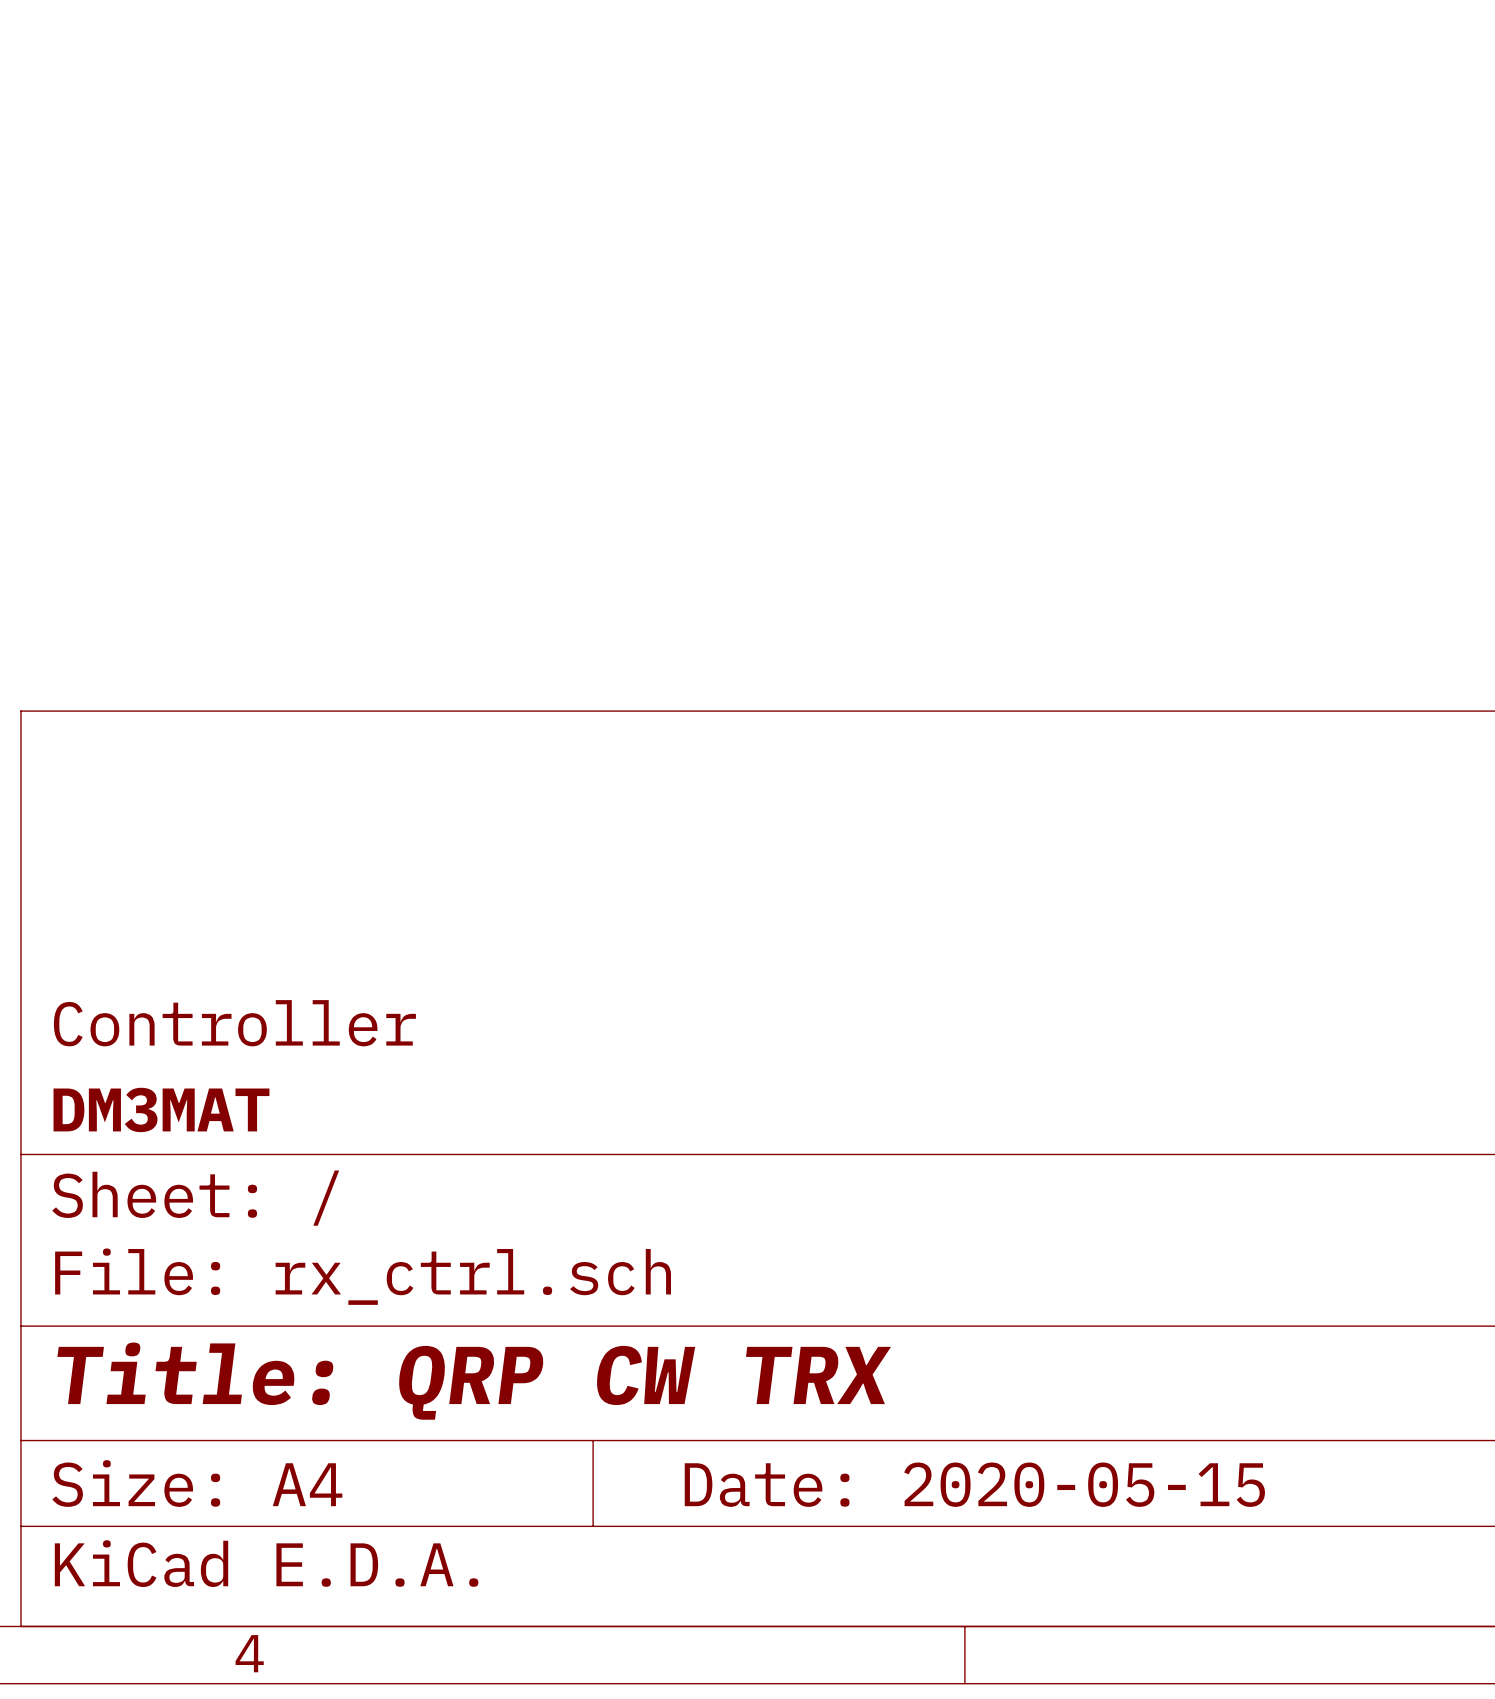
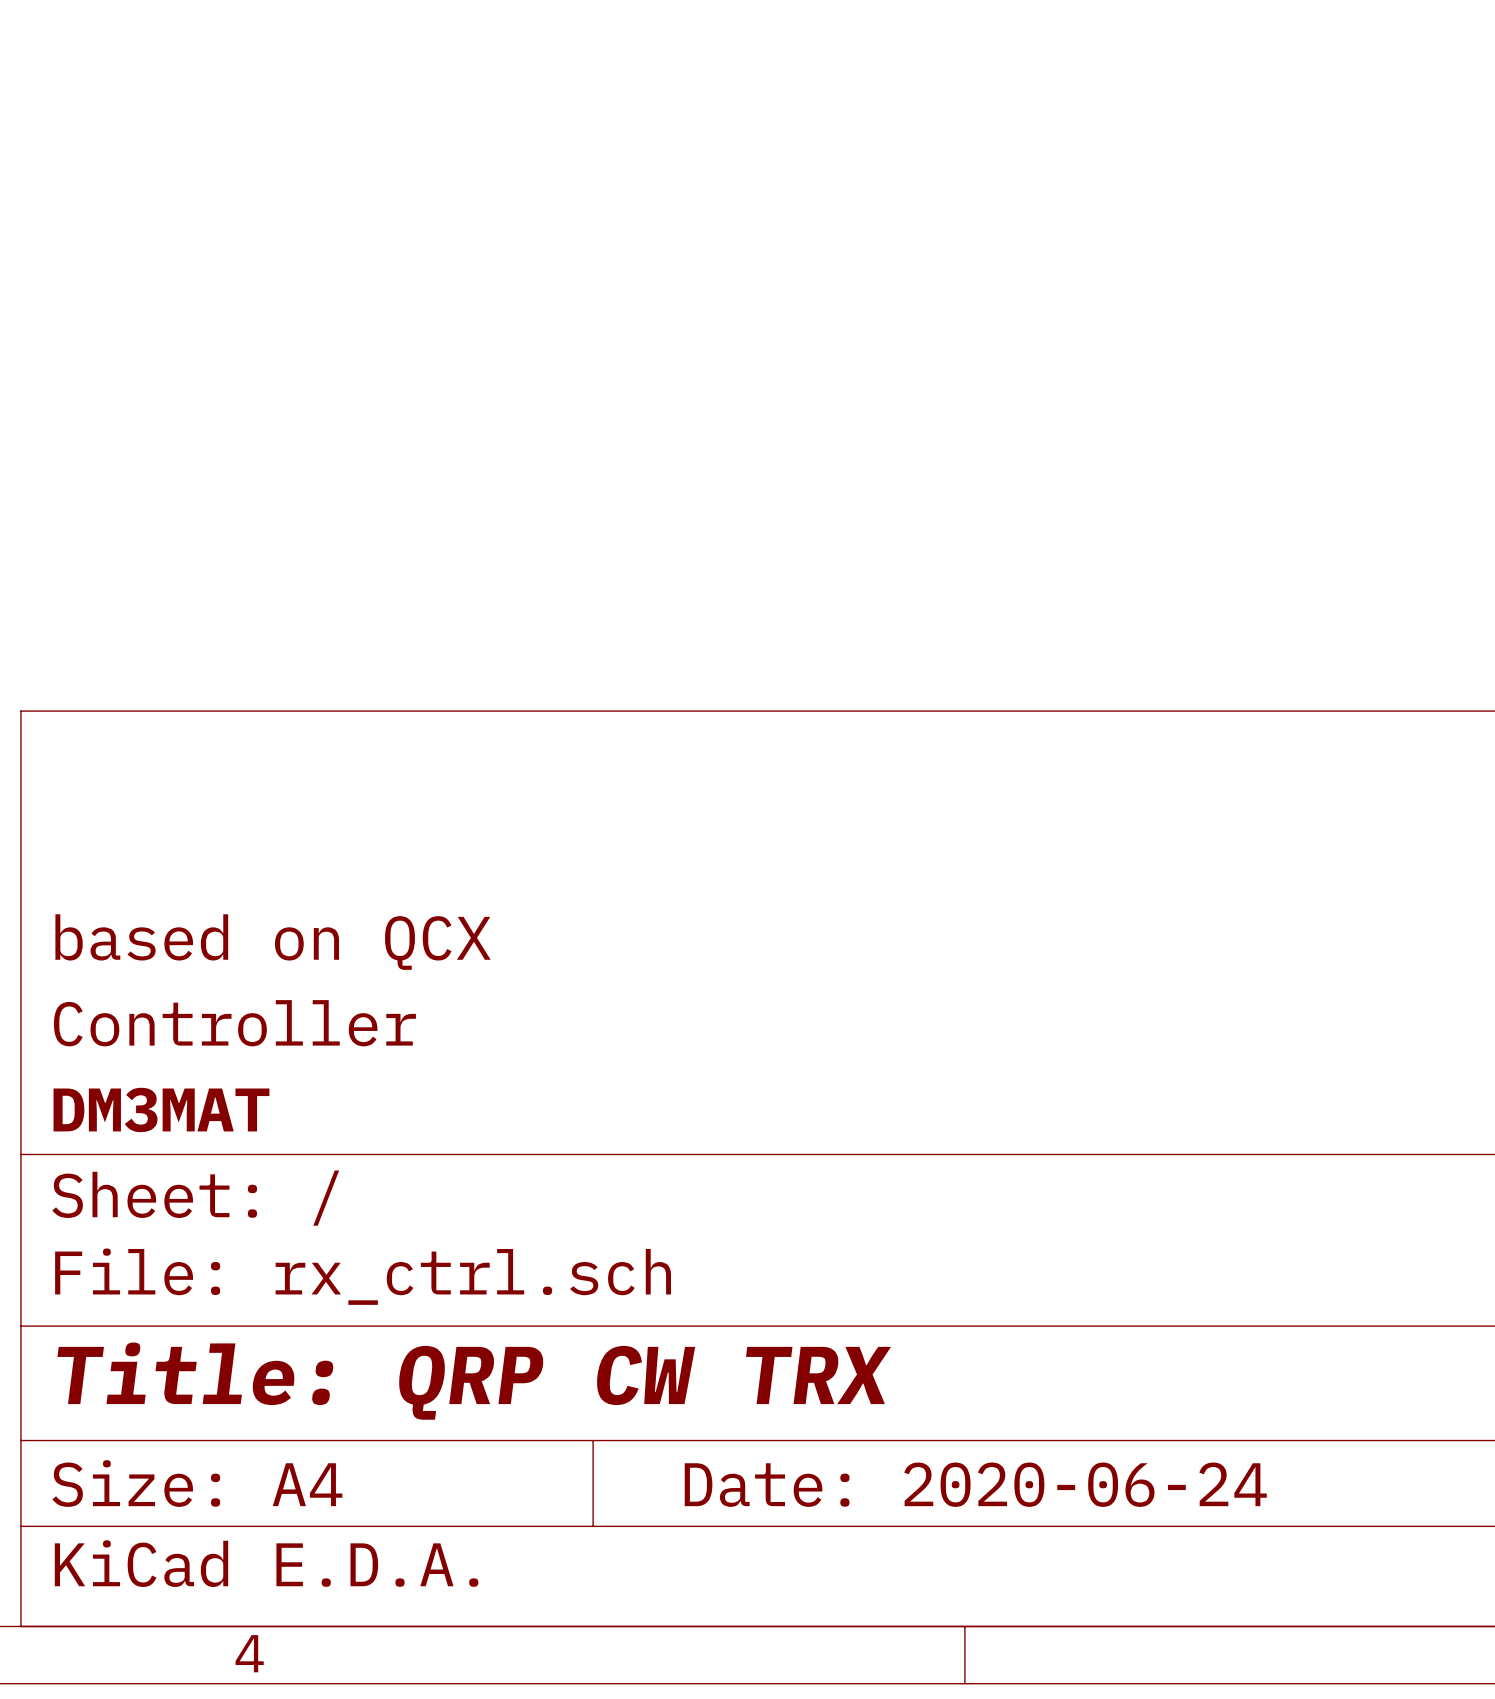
title block: none -> based on QCX (273, 942)
title block: Date: 2020-05-15 (974, 1484) -> Date: 2020-06-24 (975, 1484)

